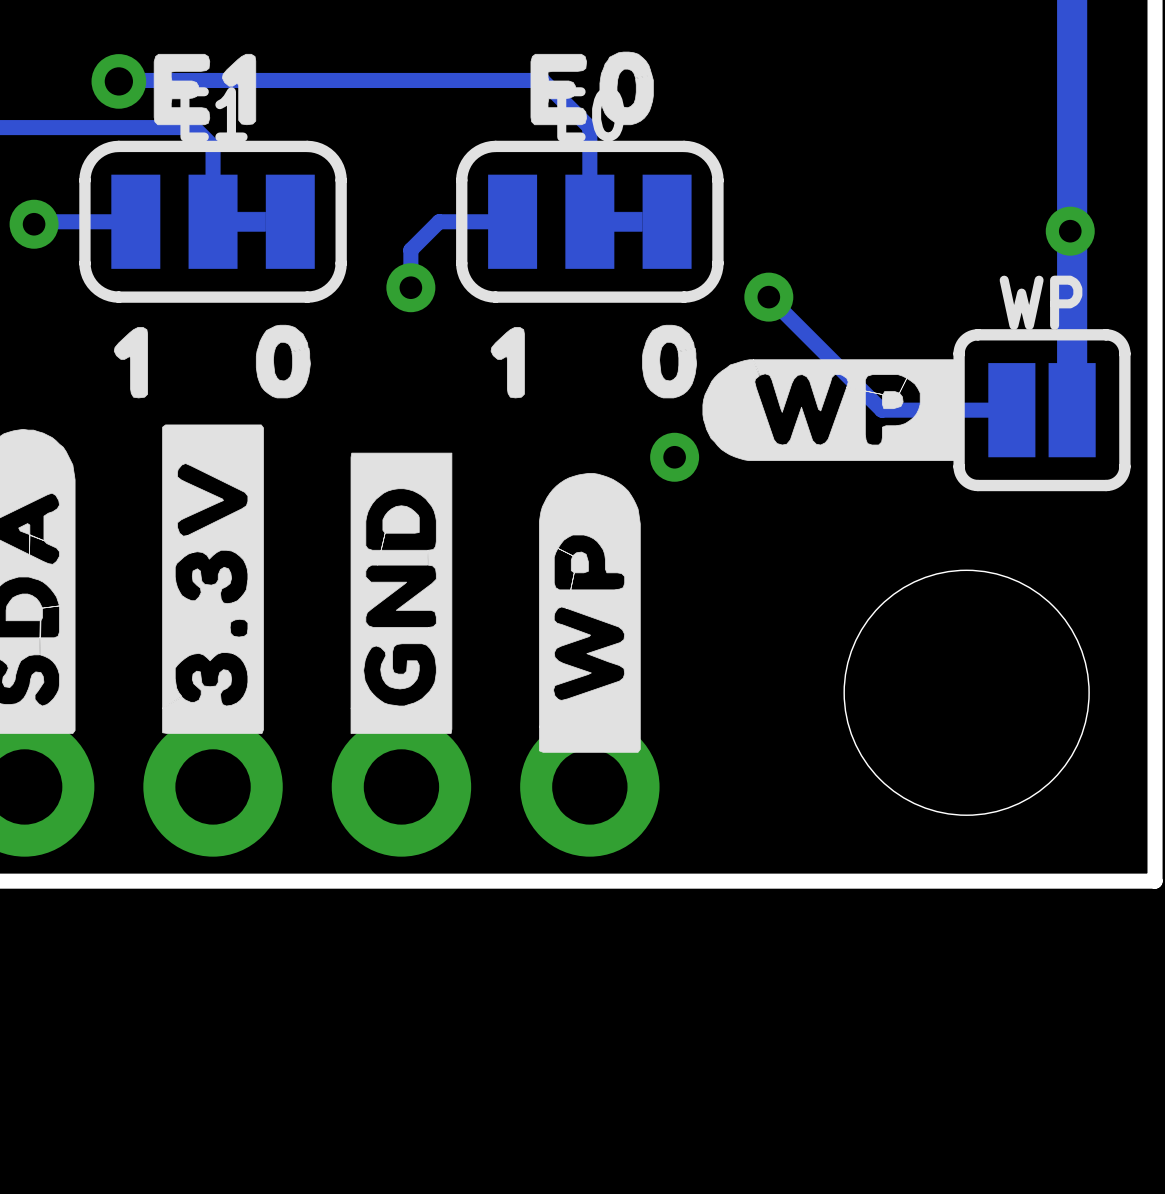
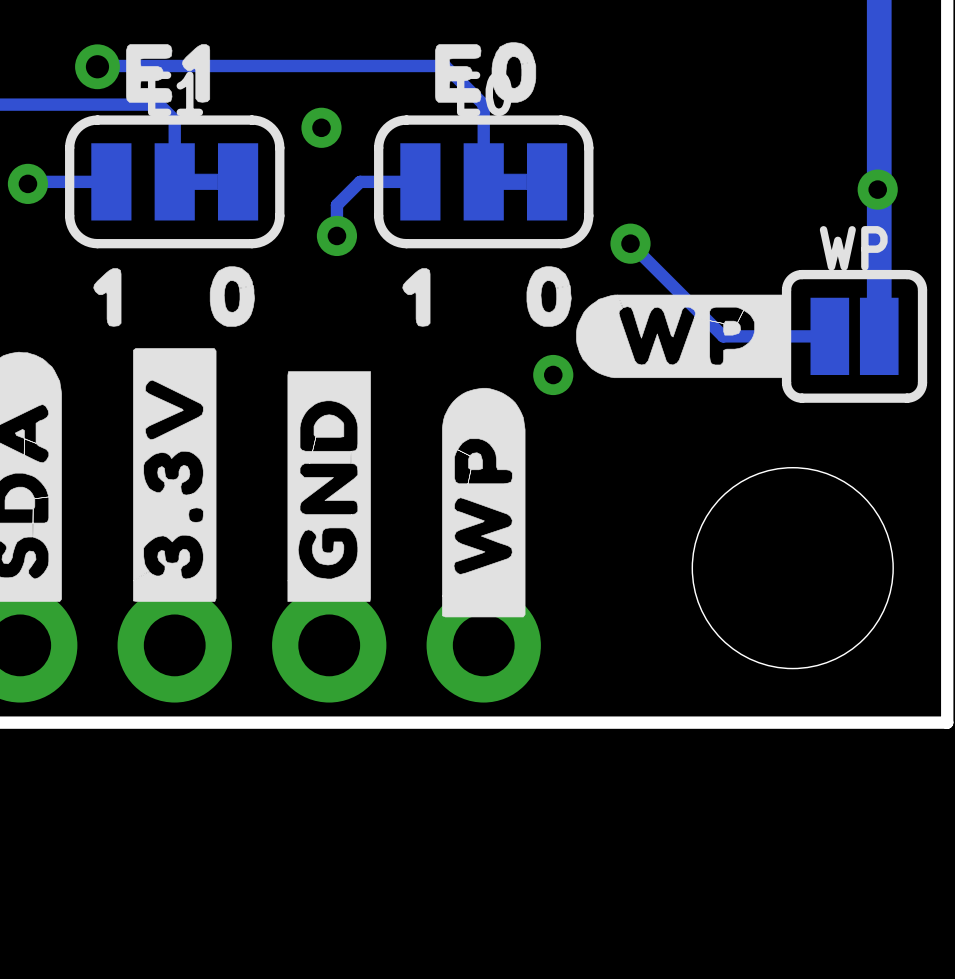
via: none -> (321, 127)

